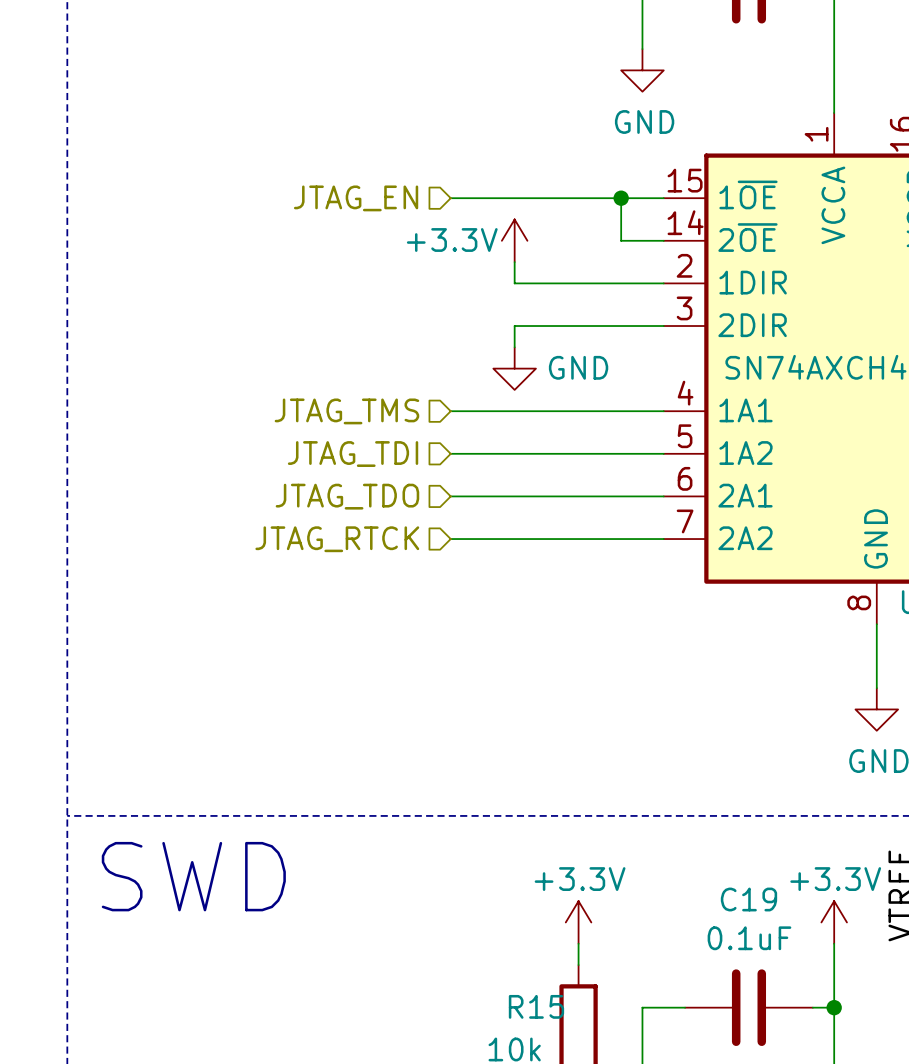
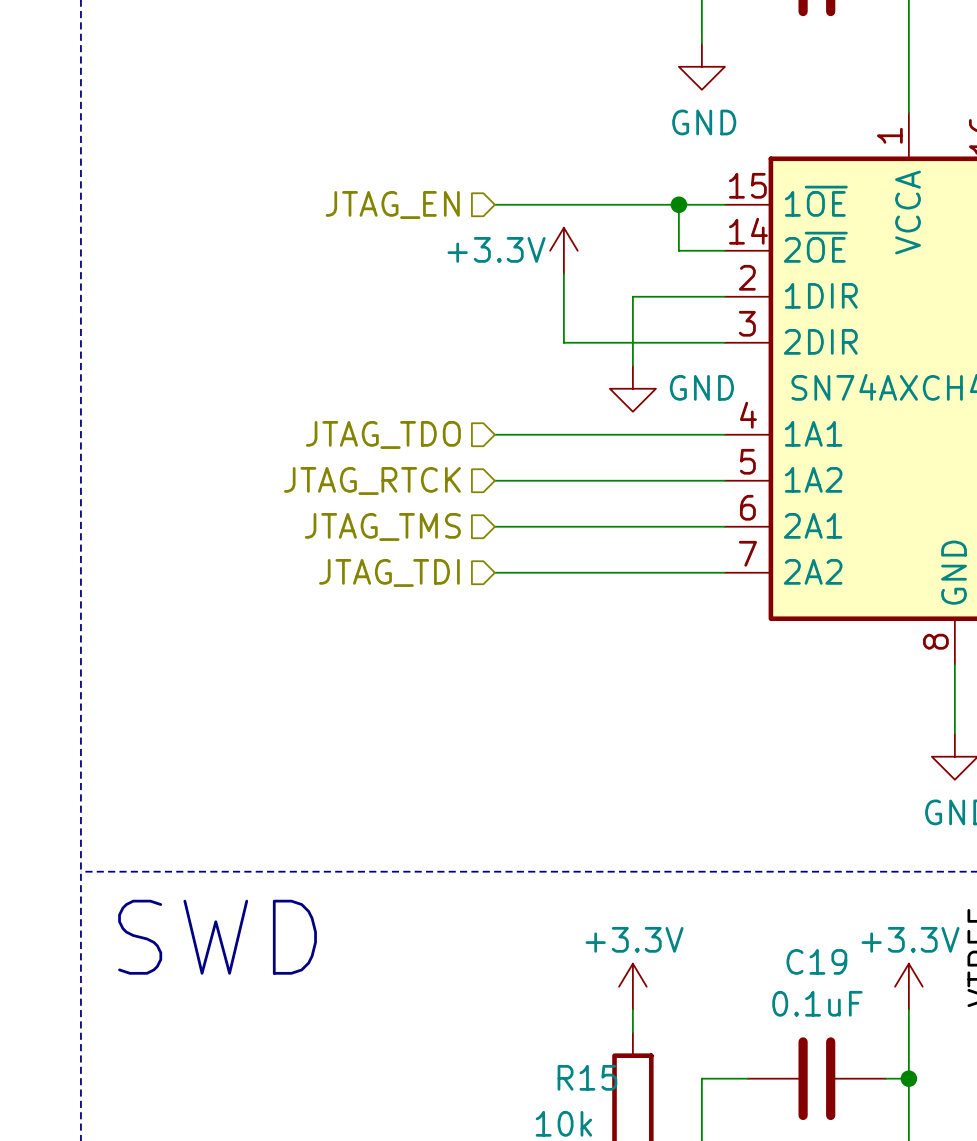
wire: (514, 283) (578, 283) -> (632, 365) (632, 296)
wire: (514, 326) (514, 347) -> (563, 342) (563, 296)
power symbol position: GND (514, 368) -> GND (632, 388)
hierarchical label: JTAG_TMS (346, 411) -> JTAG_TDO (383, 434)
hierarchical label: JTAG_TDI (353, 454) -> JTAG_RTCK (372, 480)
hierarchical label: JTAG_TDO (347, 496) -> JTAG_TMS (382, 526)
hierarchical label: JTAG_RTCK (337, 539) -> JTAG_TDI (389, 572)

